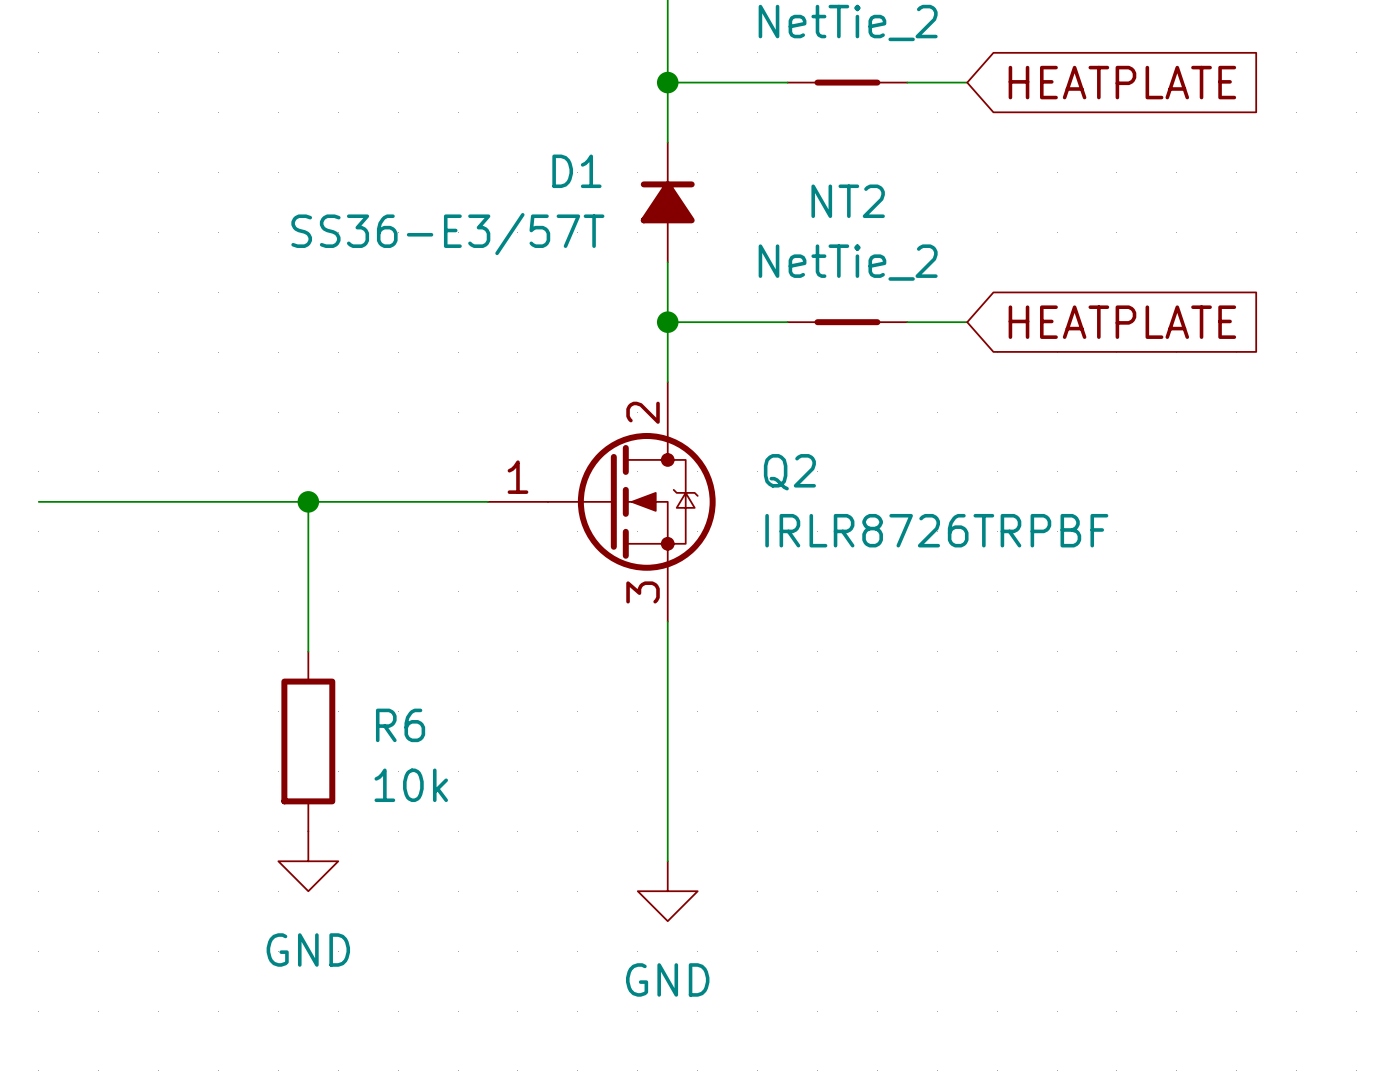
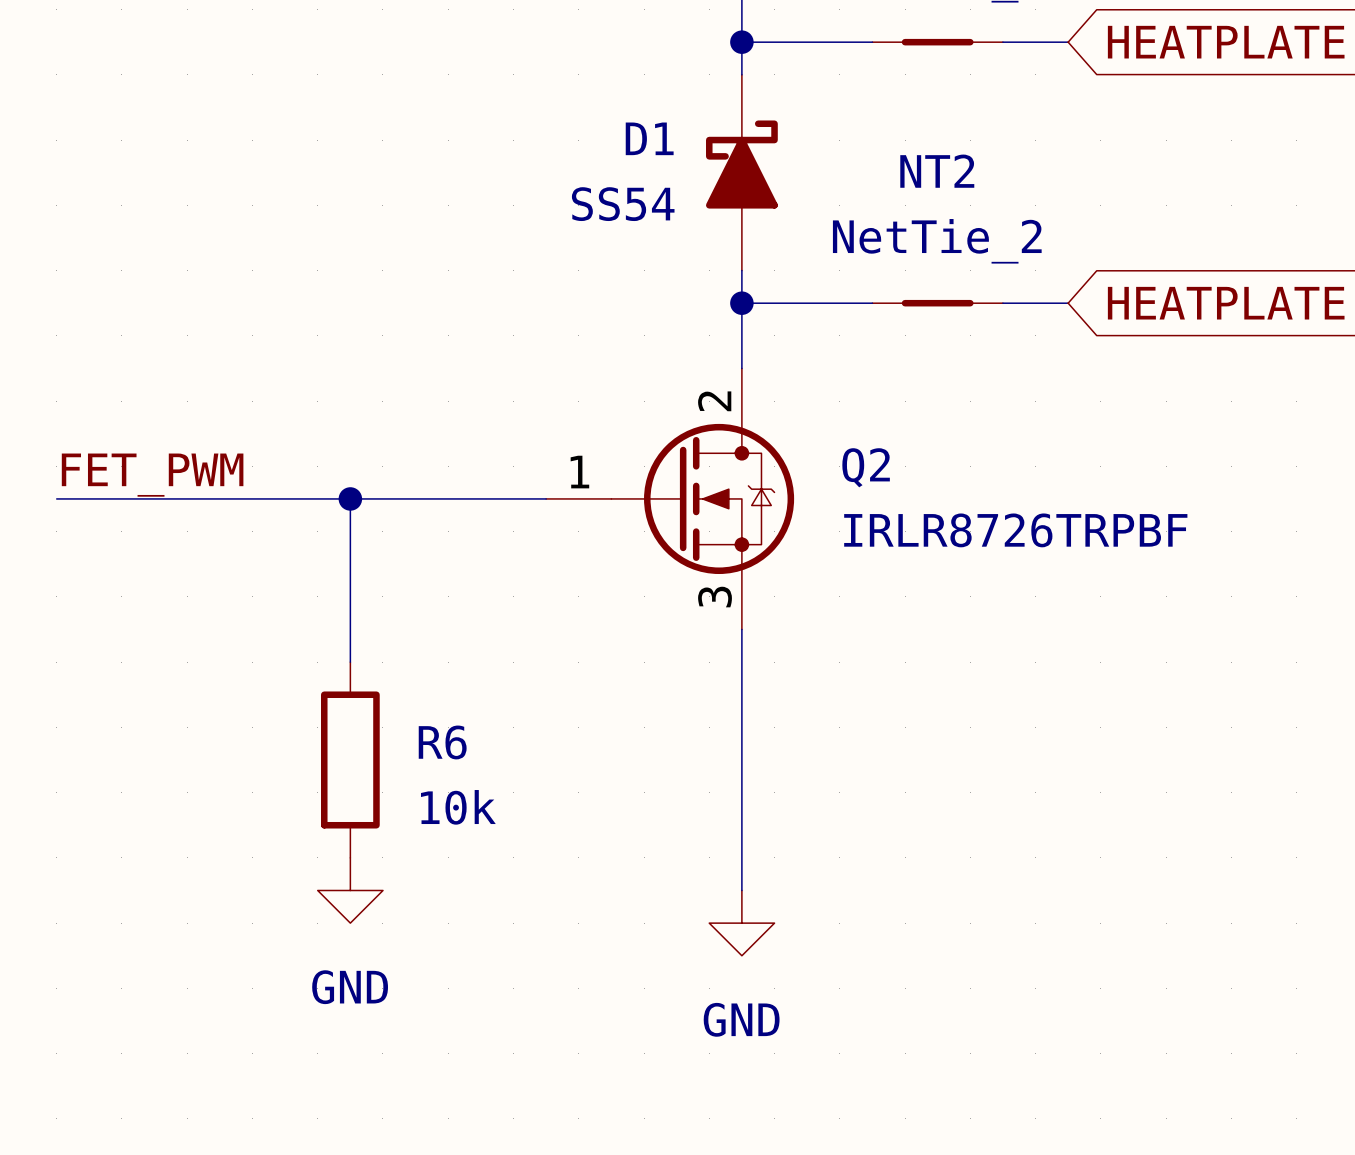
D1 symbol: [640, 142, 695, 263] -> [706, 74, 778, 271]
D1 value: SS36-E3/57T (447, 234) -> SS54 (623, 204)
label: none -> FET_PWM (152, 475)

